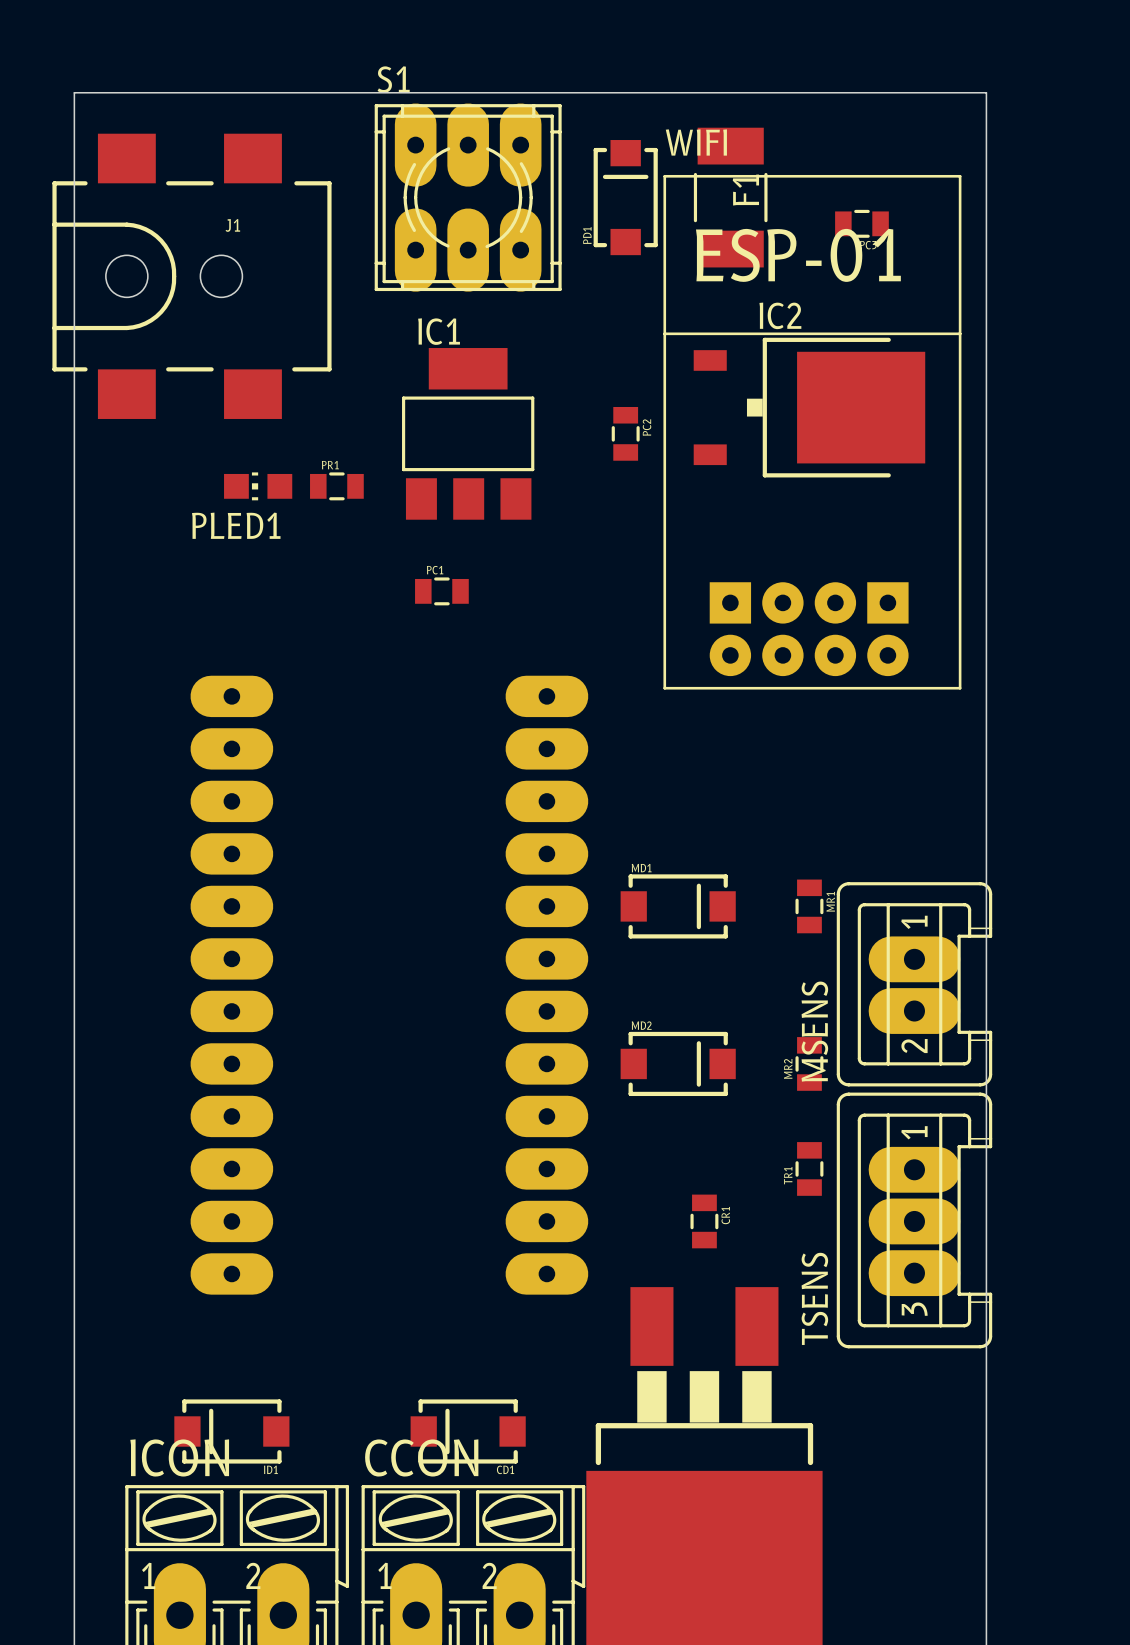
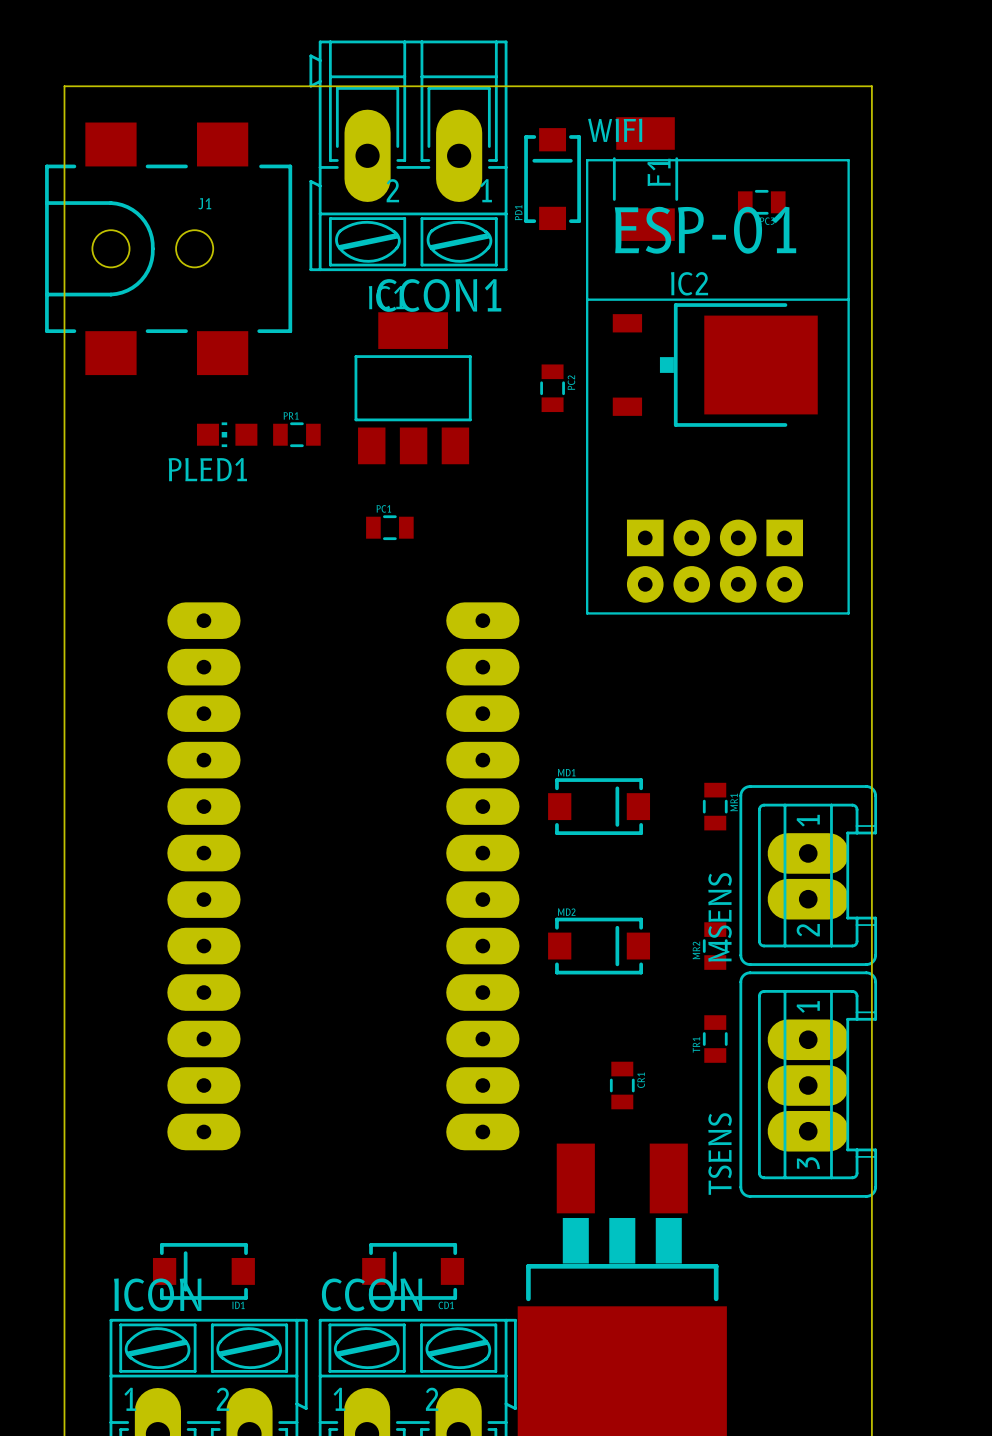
CCON1: none -> (408, 155)
S1: (468, 197) -> none

